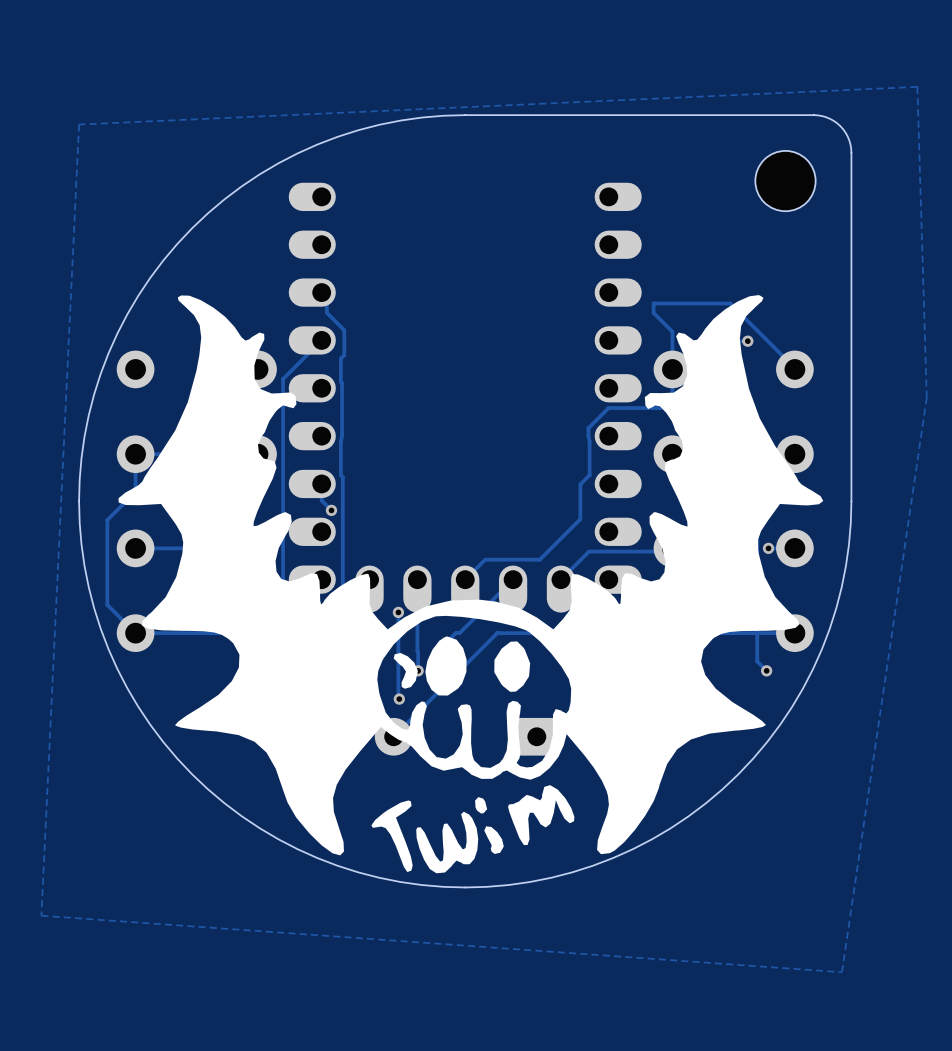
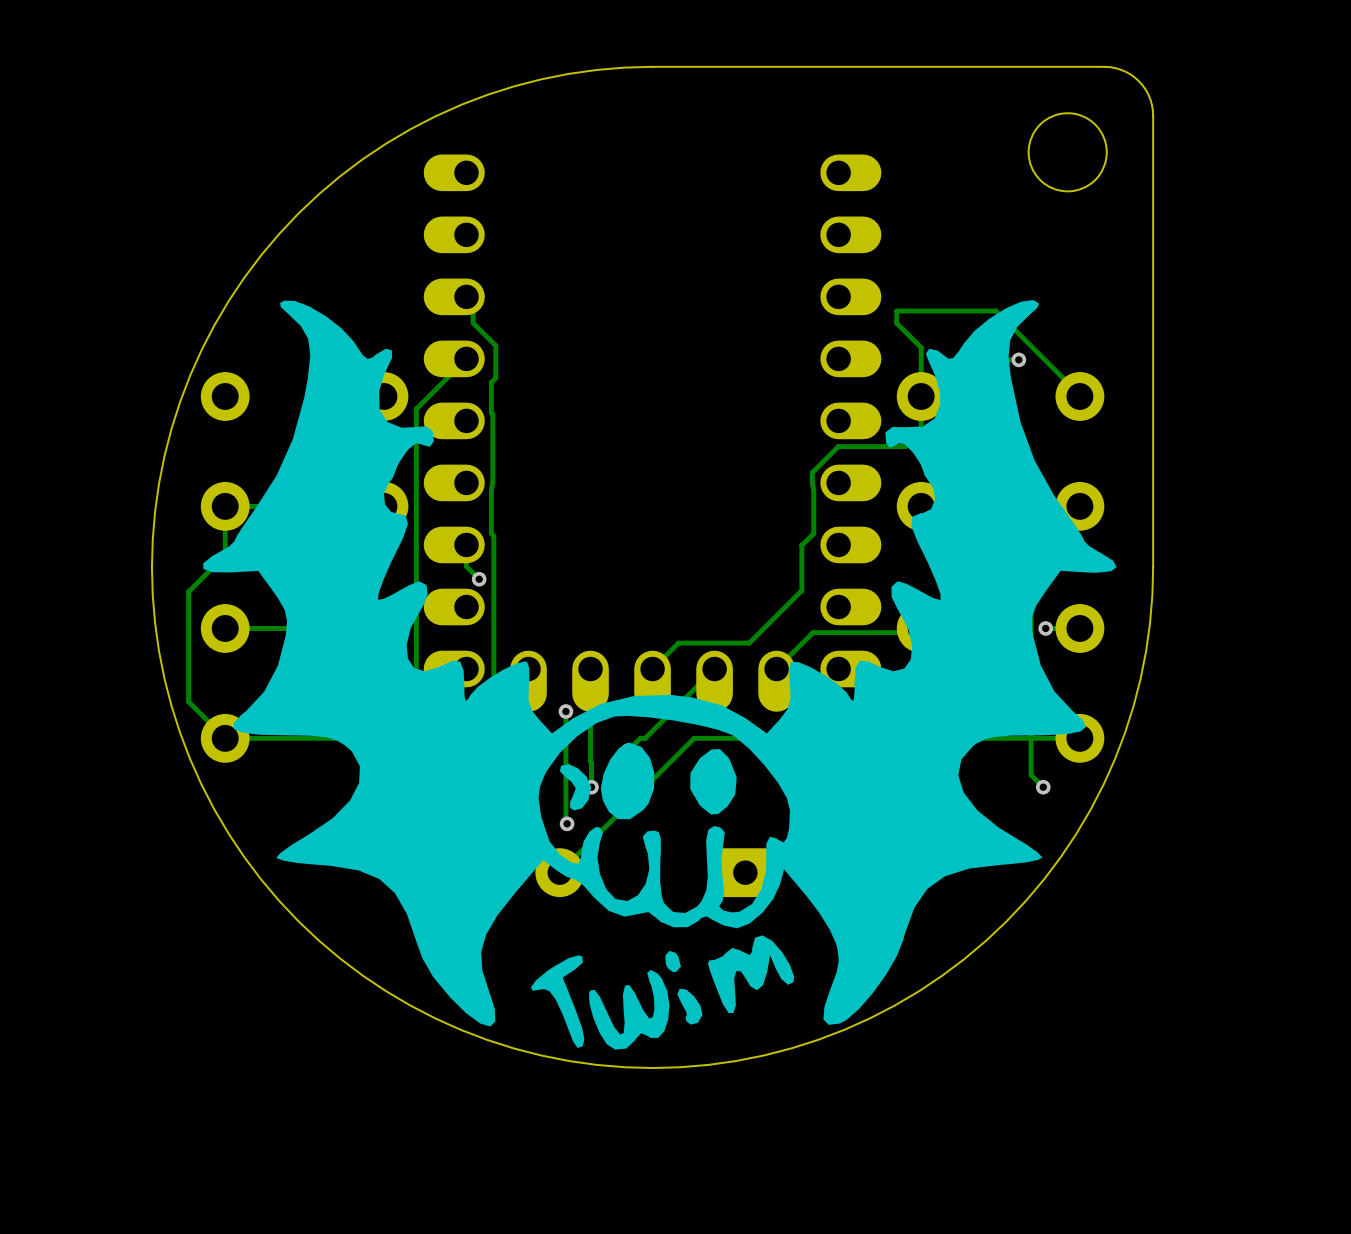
zone outline: (917, 86) (79, 124) (41, 915) (842, 972) (926, 397) (917, 86) -> none

